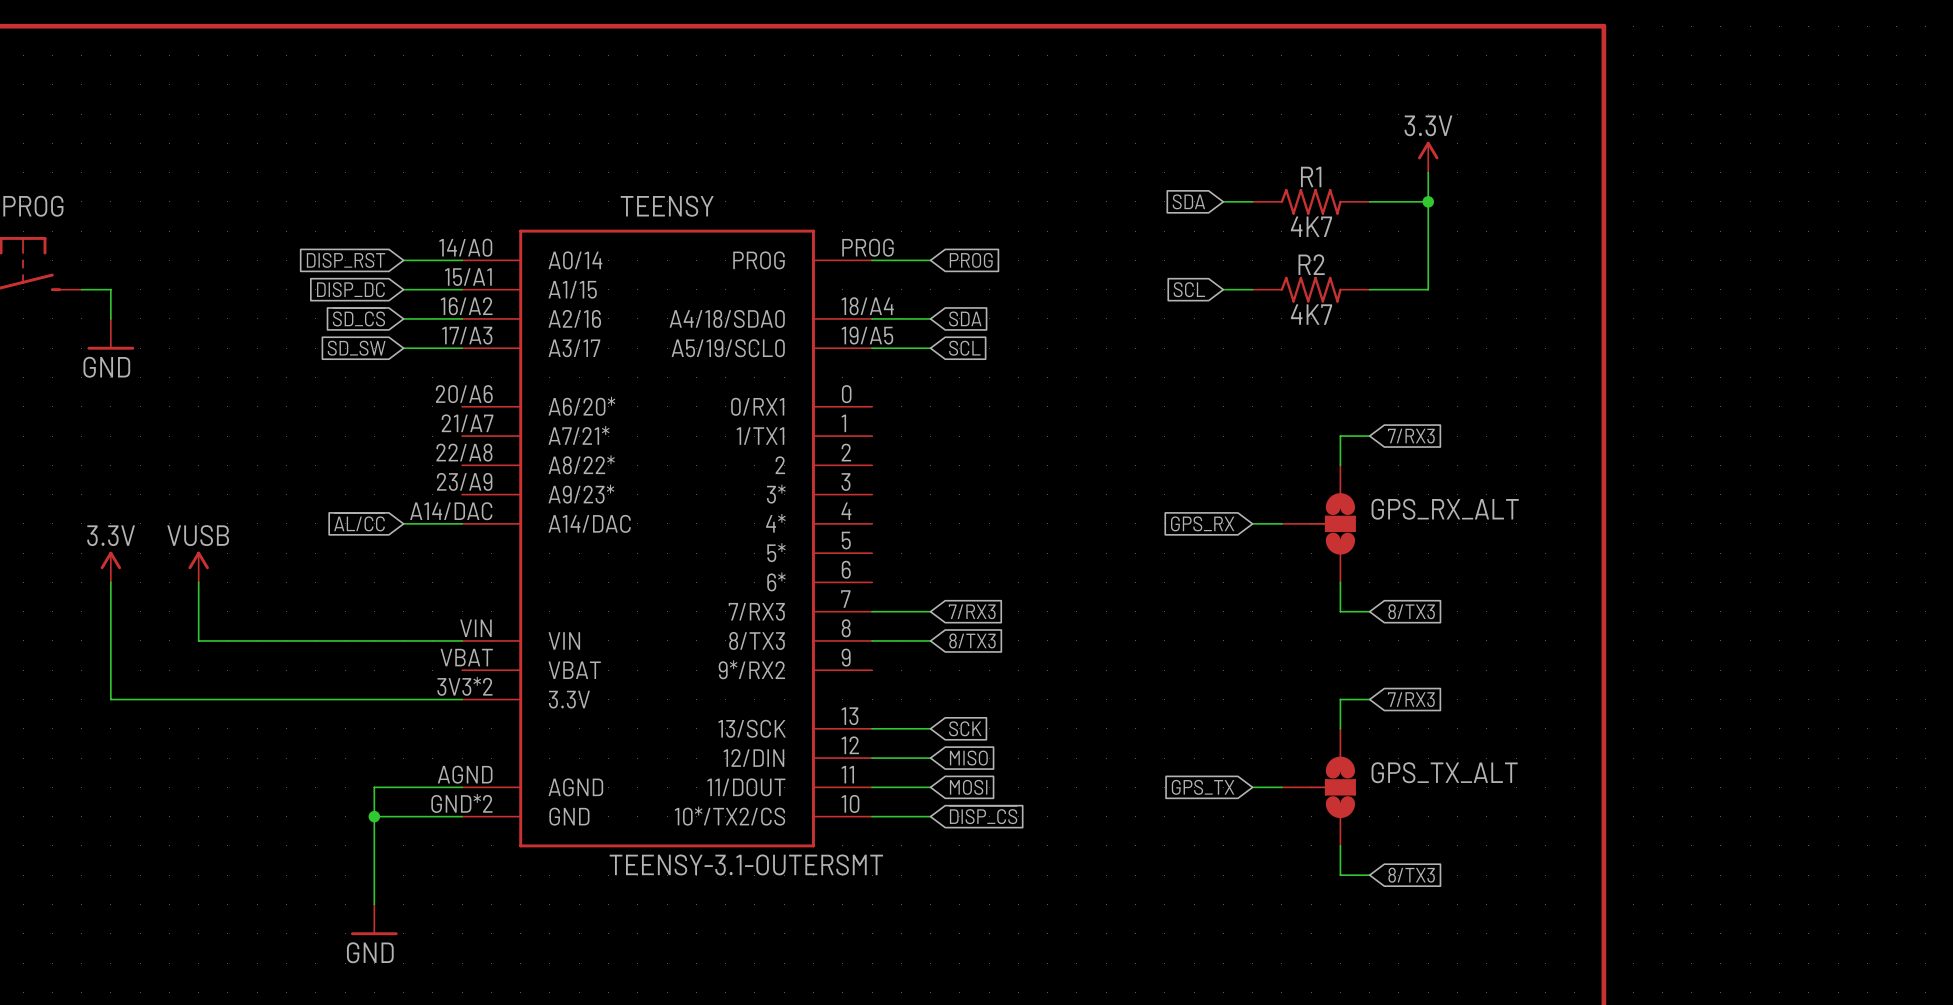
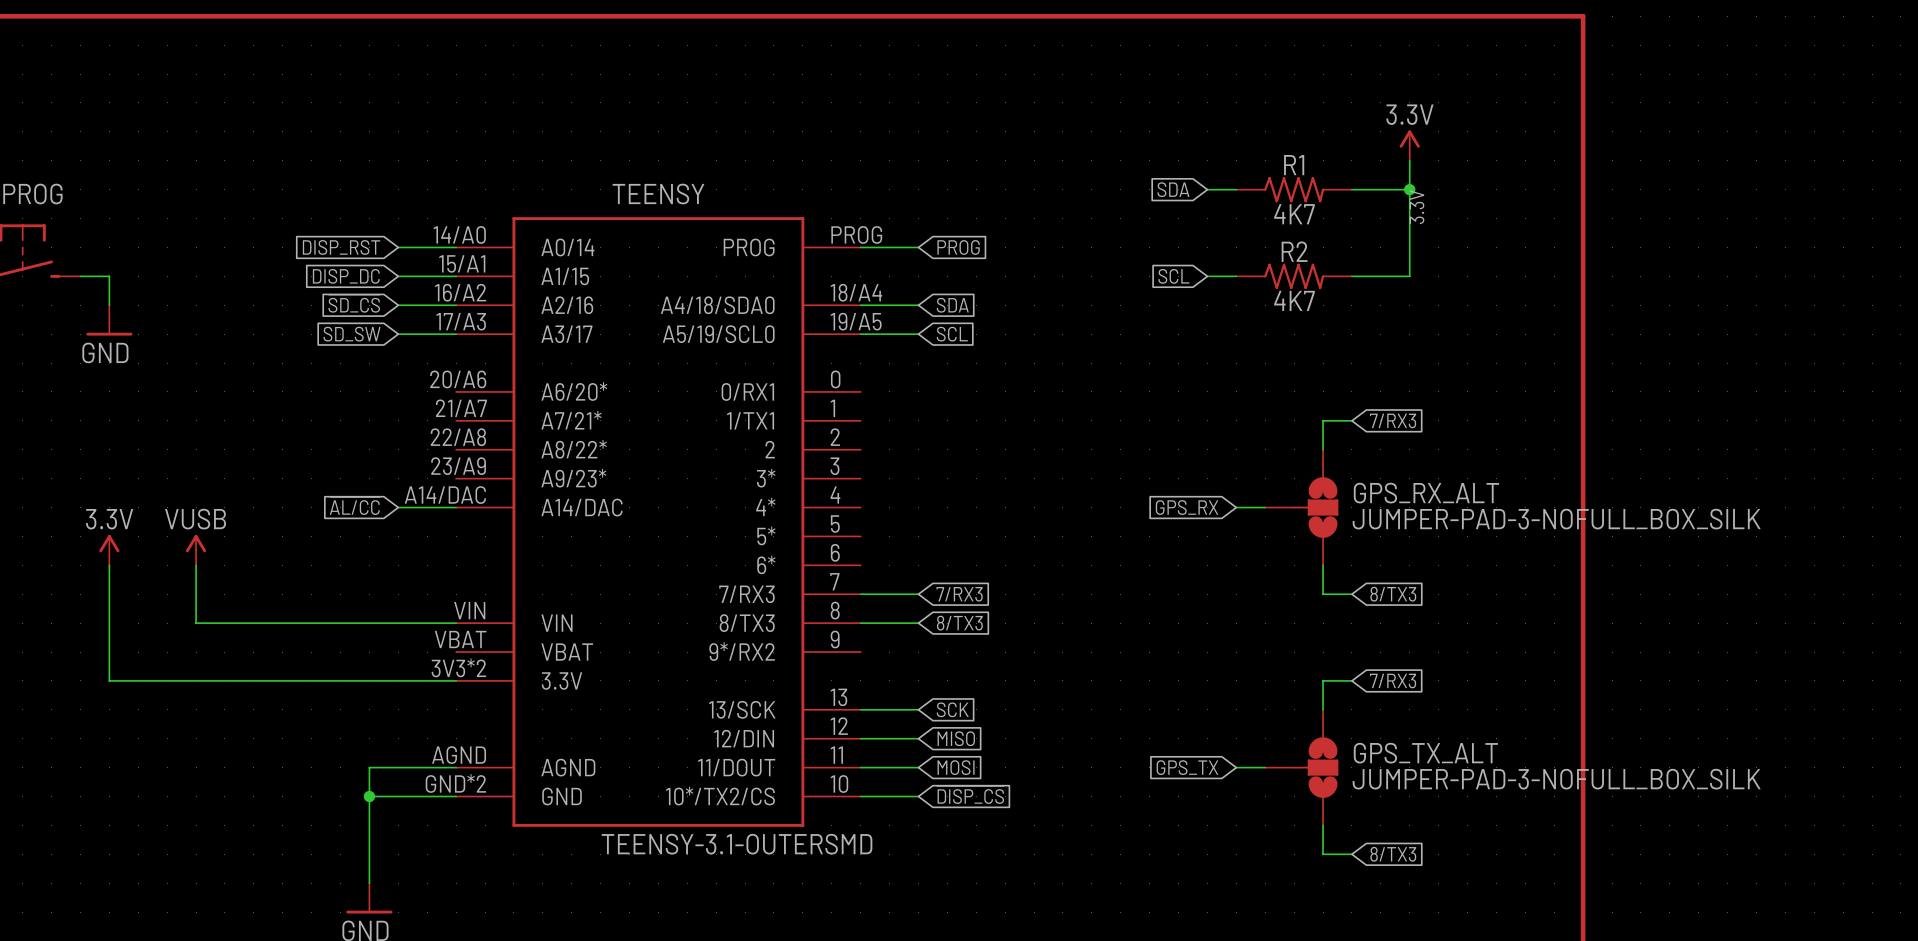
label: none -> 3.3V (1417, 207)
GPS_RX_ALT value: none -> JUMPER-PAD-3-NOFULL_BOX_SILK (1556, 519)
GPS_TX_ALT value: none -> JUMPER-PAD-3-NOFULL_BOX_SILK (1556, 779)
TEENSY value: TEENSY-3.1-OUTERSMT (746, 864) -> TEENSY-3.1-OUTERSMD (737, 844)

